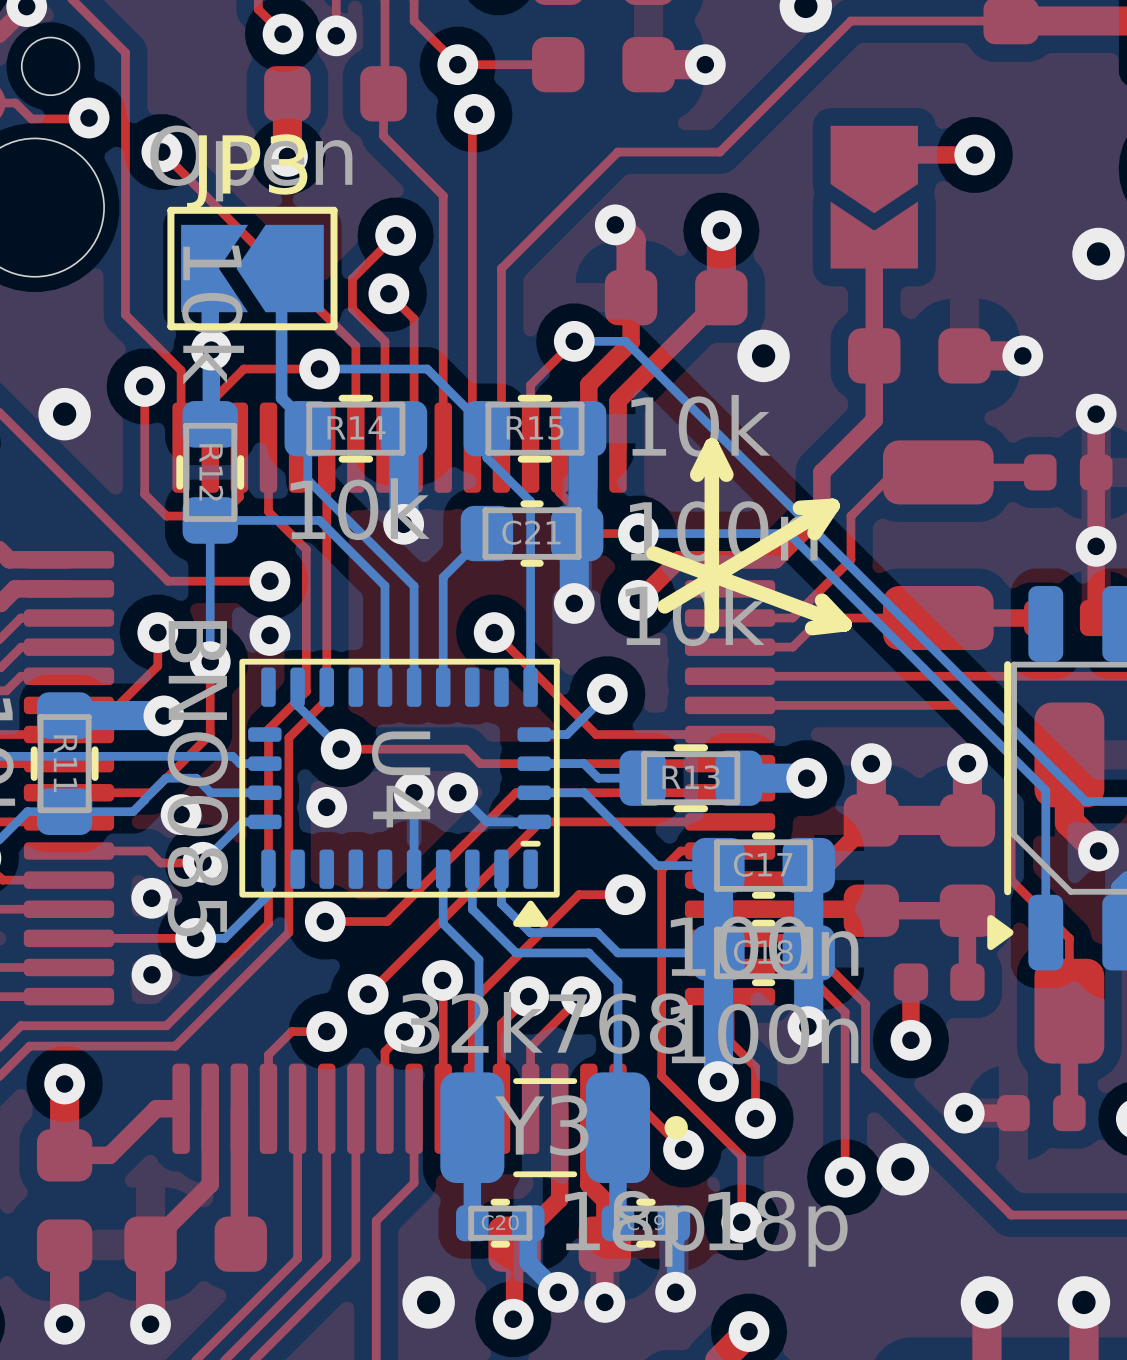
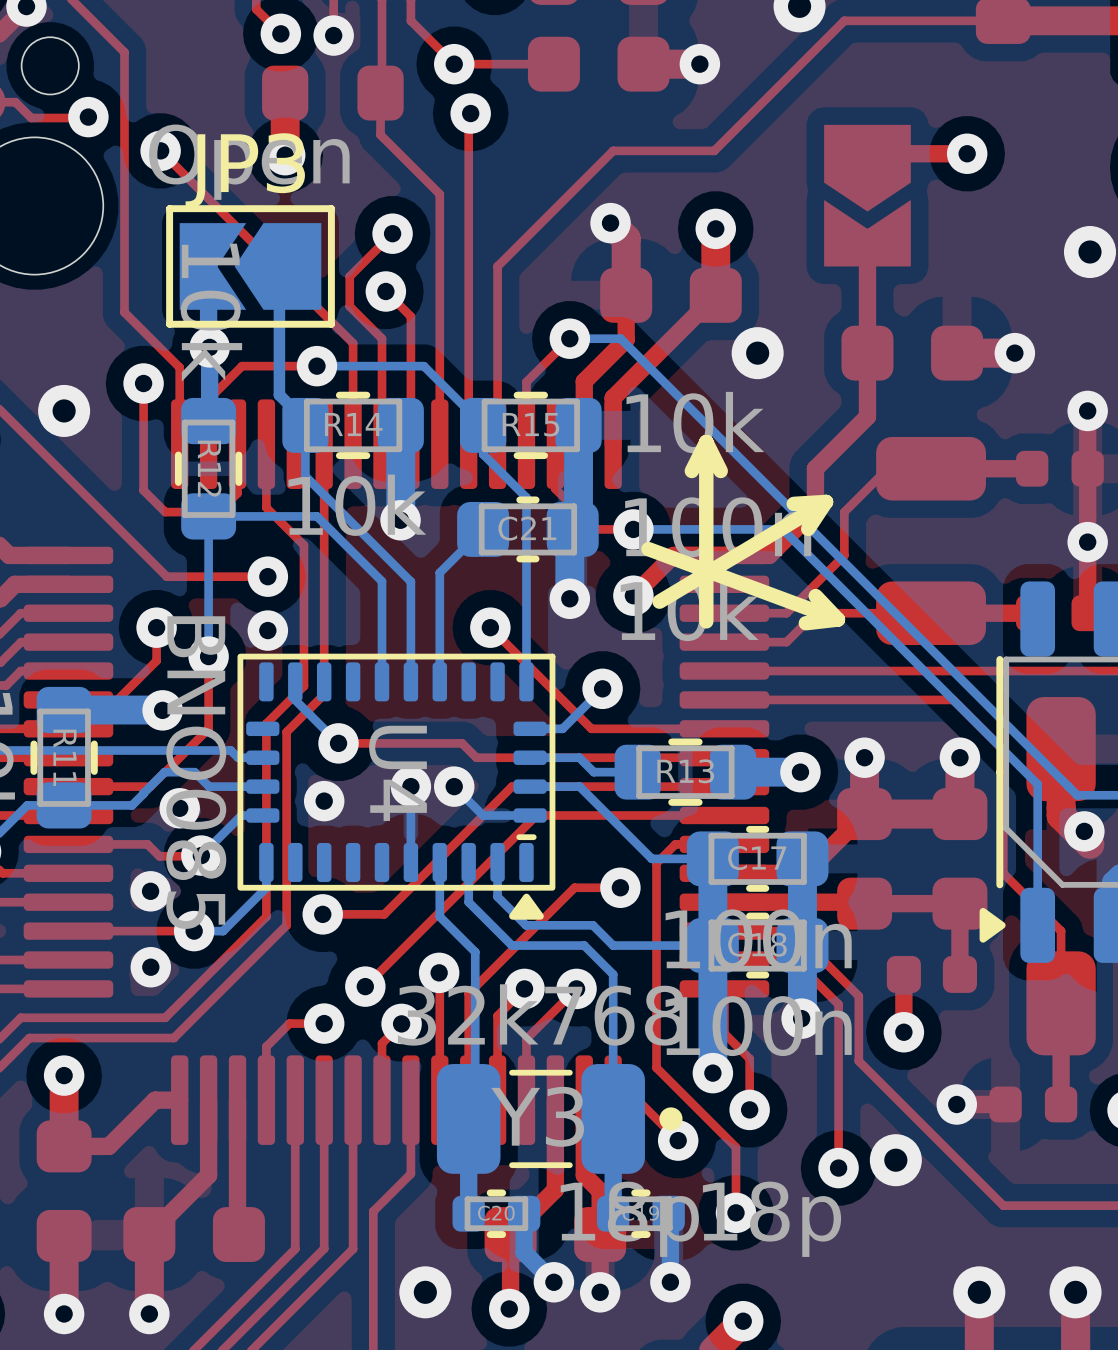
via position: (1098, 851) -> (1084, 831)

